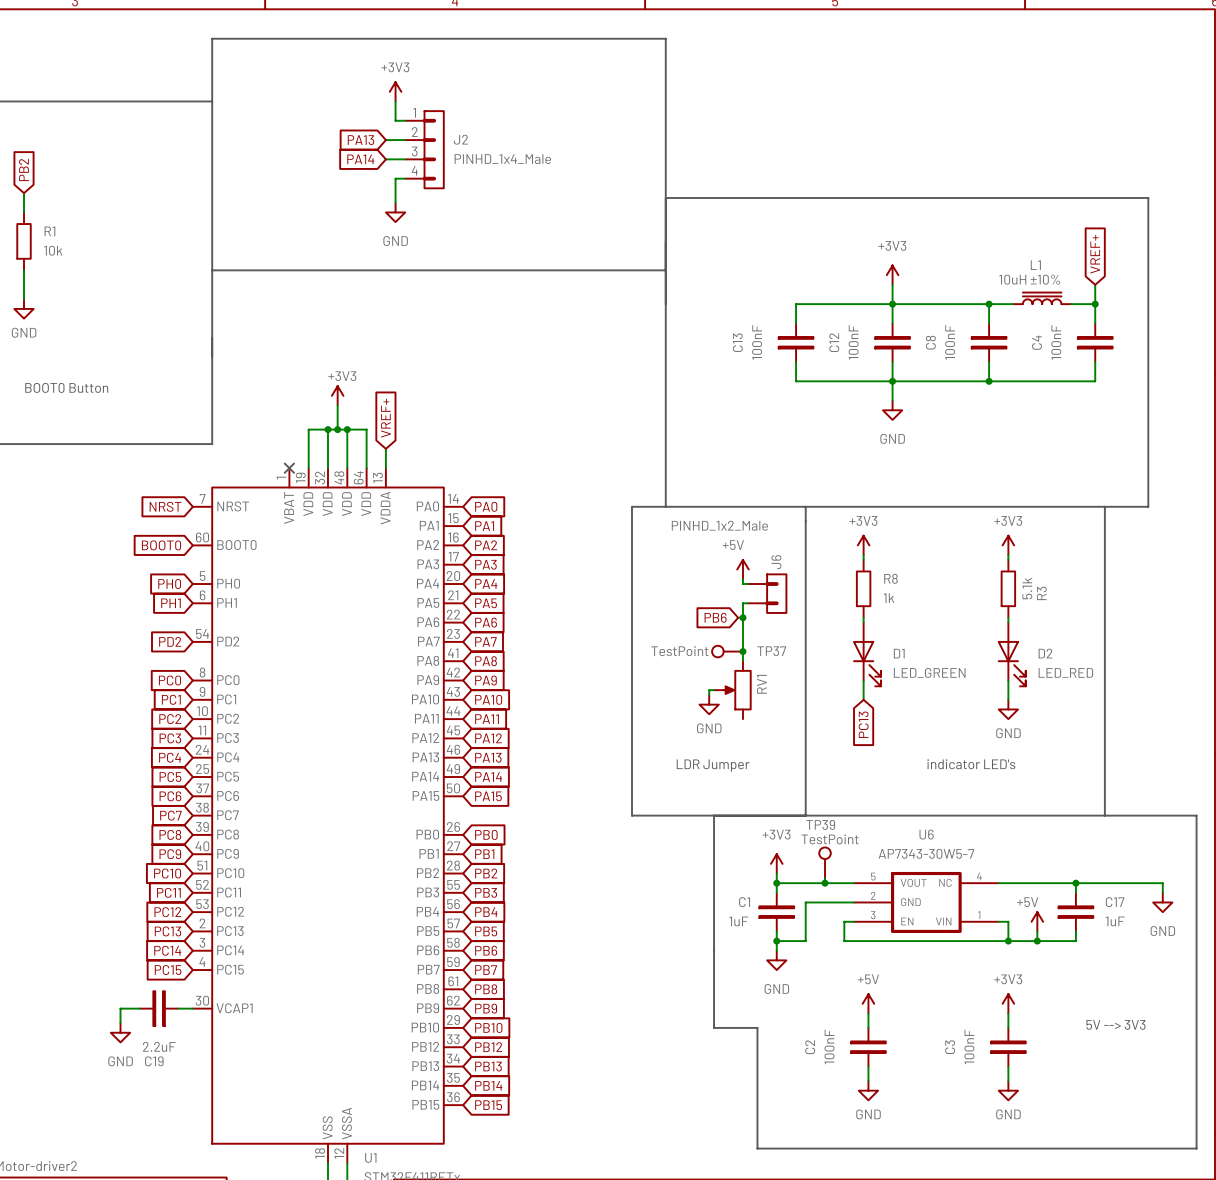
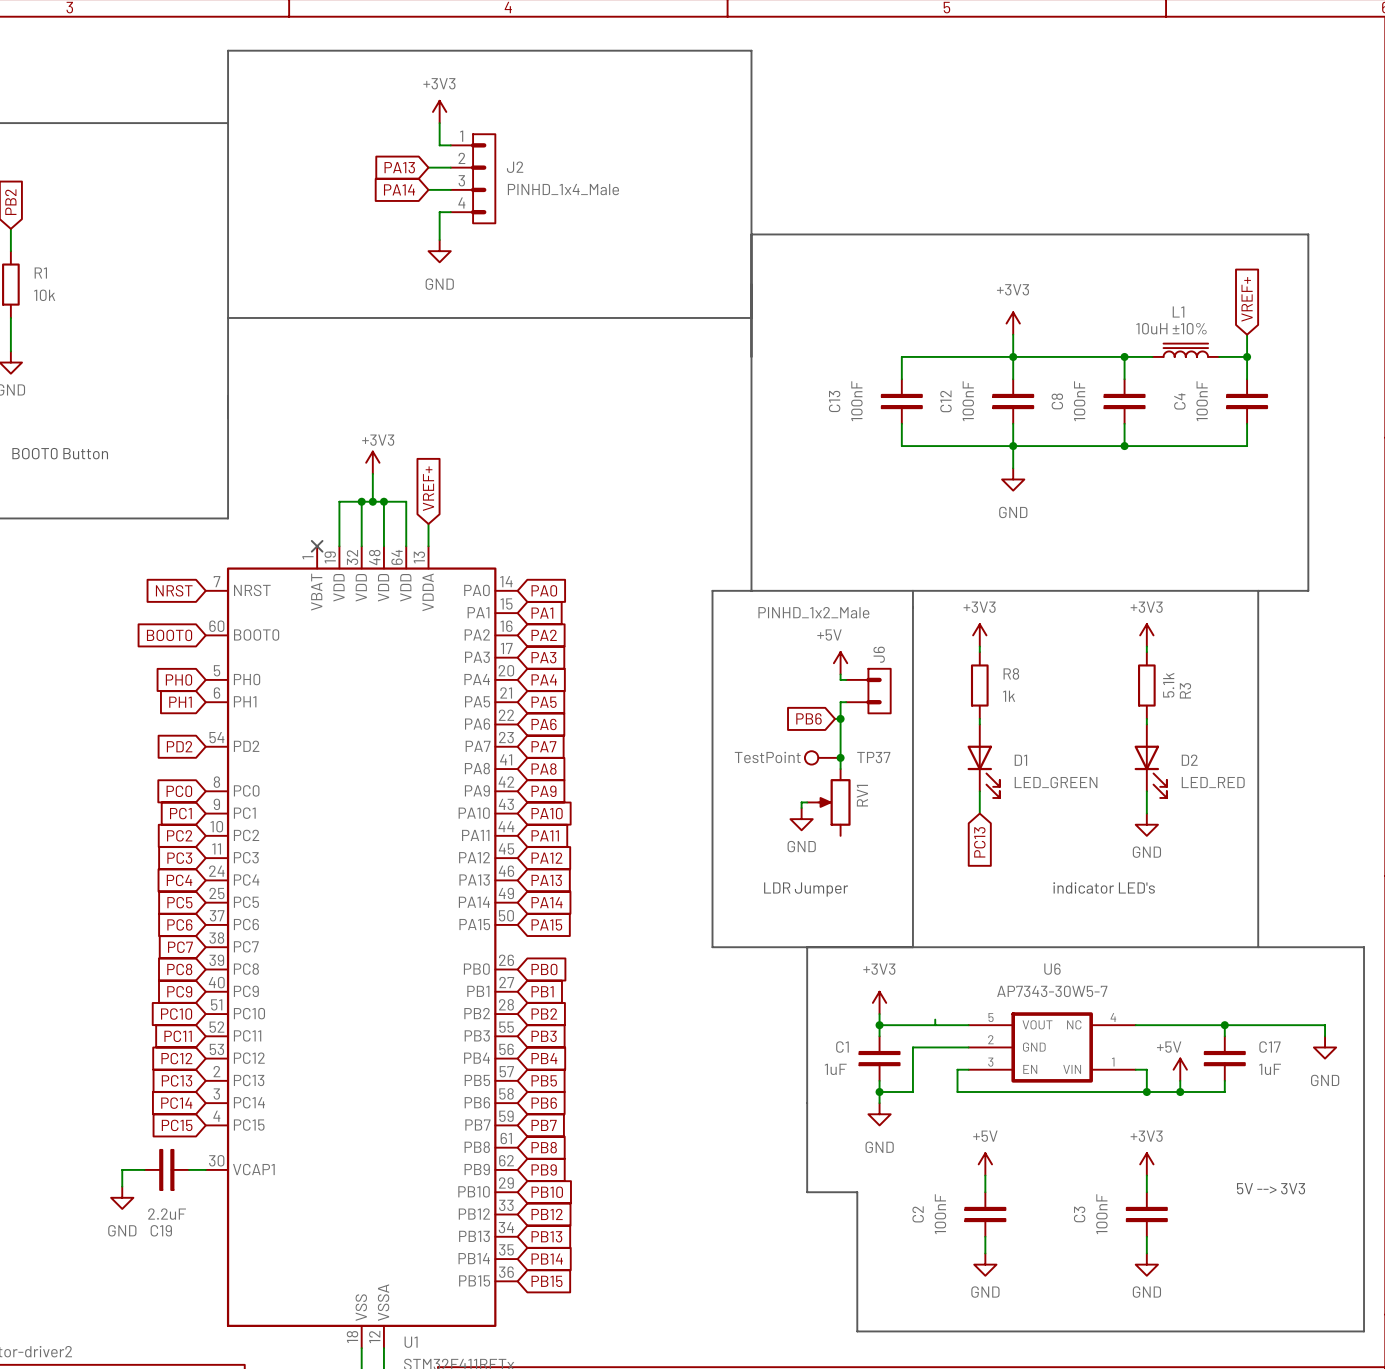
TP39: TestPoint (825, 862) -> none
junction: (825, 883) -> none

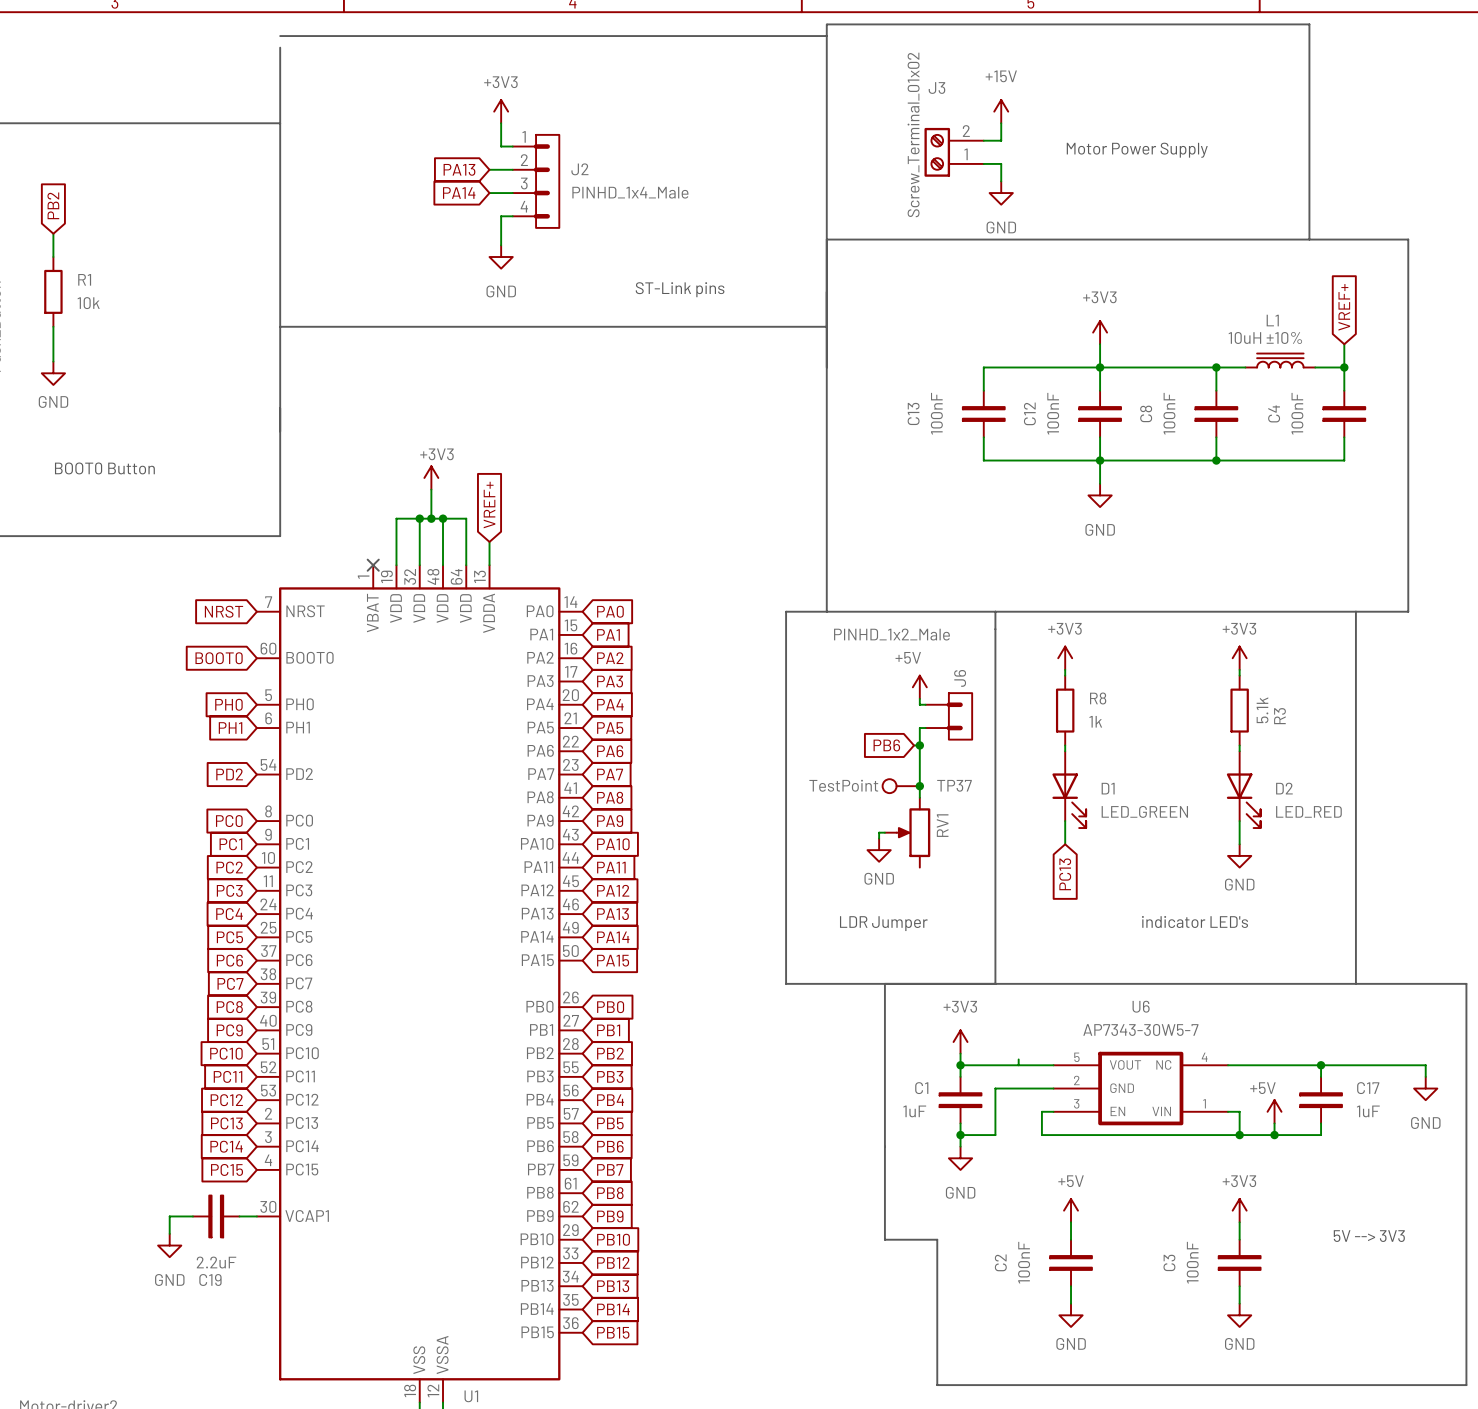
line: none -> (827, 24) (1309, 24) (1309, 239)
line: none -> (280, 36) (826, 36)
line: (228, 50) (751, 50) -> (826, 24) (826, 47)
power symbol: none -> +15V (1001, 111)
wire: none -> (1001, 123) (1001, 140) (983, 140)
text: none -> Motor Power Supply (1137, 150)
J3: none -> Screw_Terminal_01x02 (954, 152)
wire: none -> (983, 163) (1001, 163) (1001, 181)
power symbol: none -> GND (1001, 193)
text: none -> ST-Link pins (680, 289)

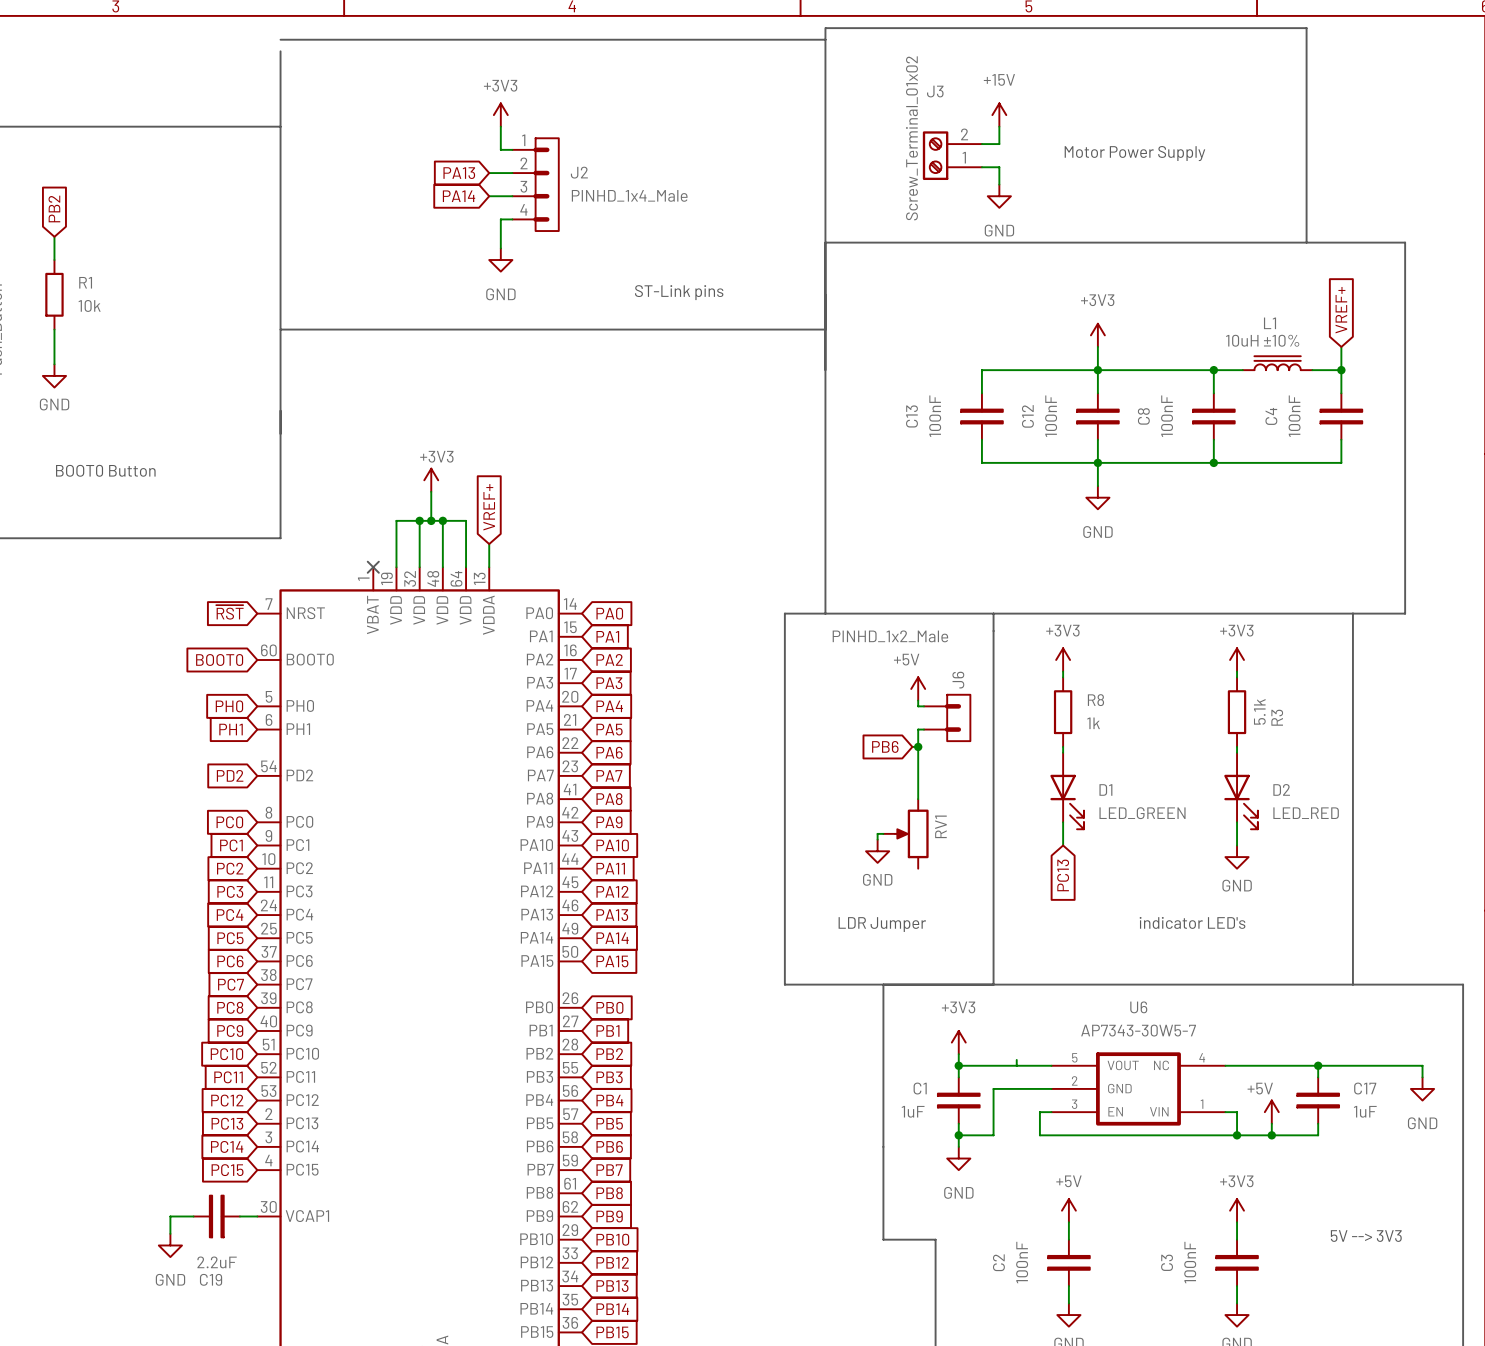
global label: NRST (223, 611) -> ~{RST} (229, 612)
TP37: TestPoint (901, 786) -> none
junction: (919, 786) -> none

